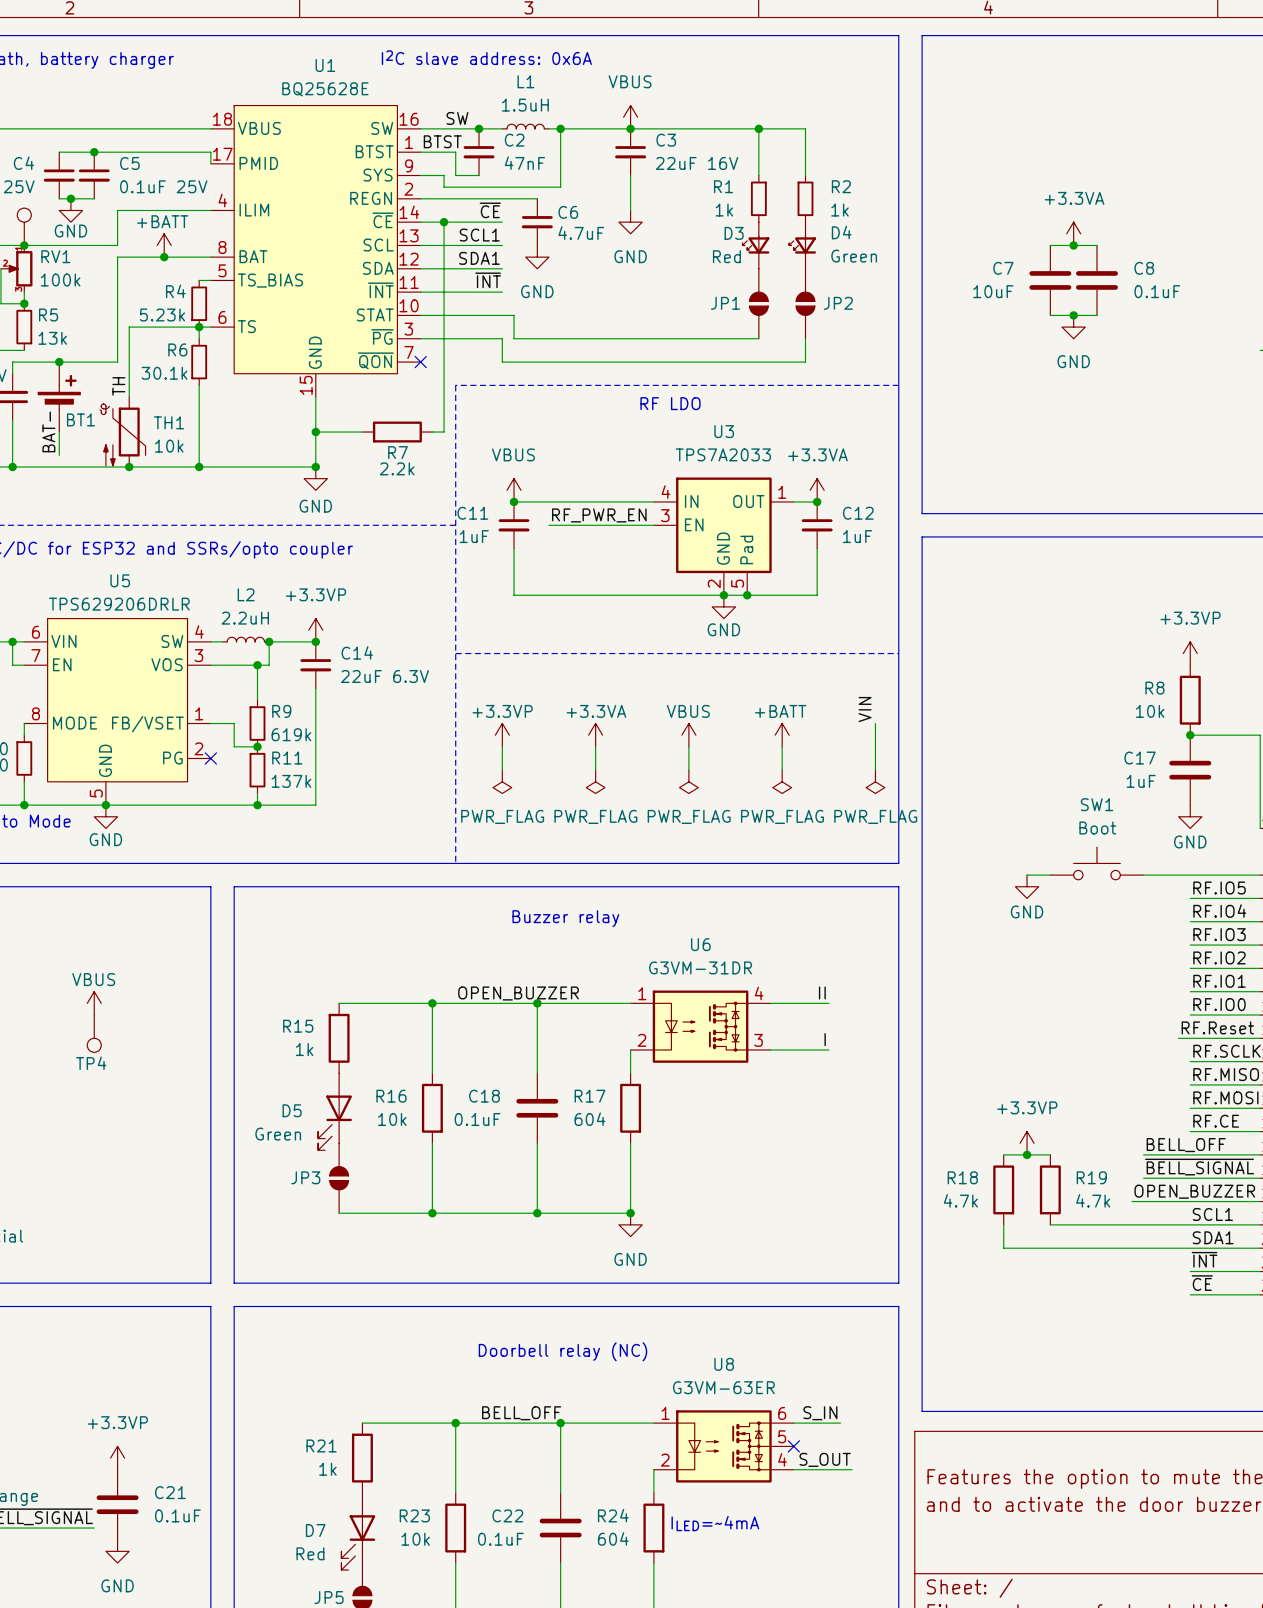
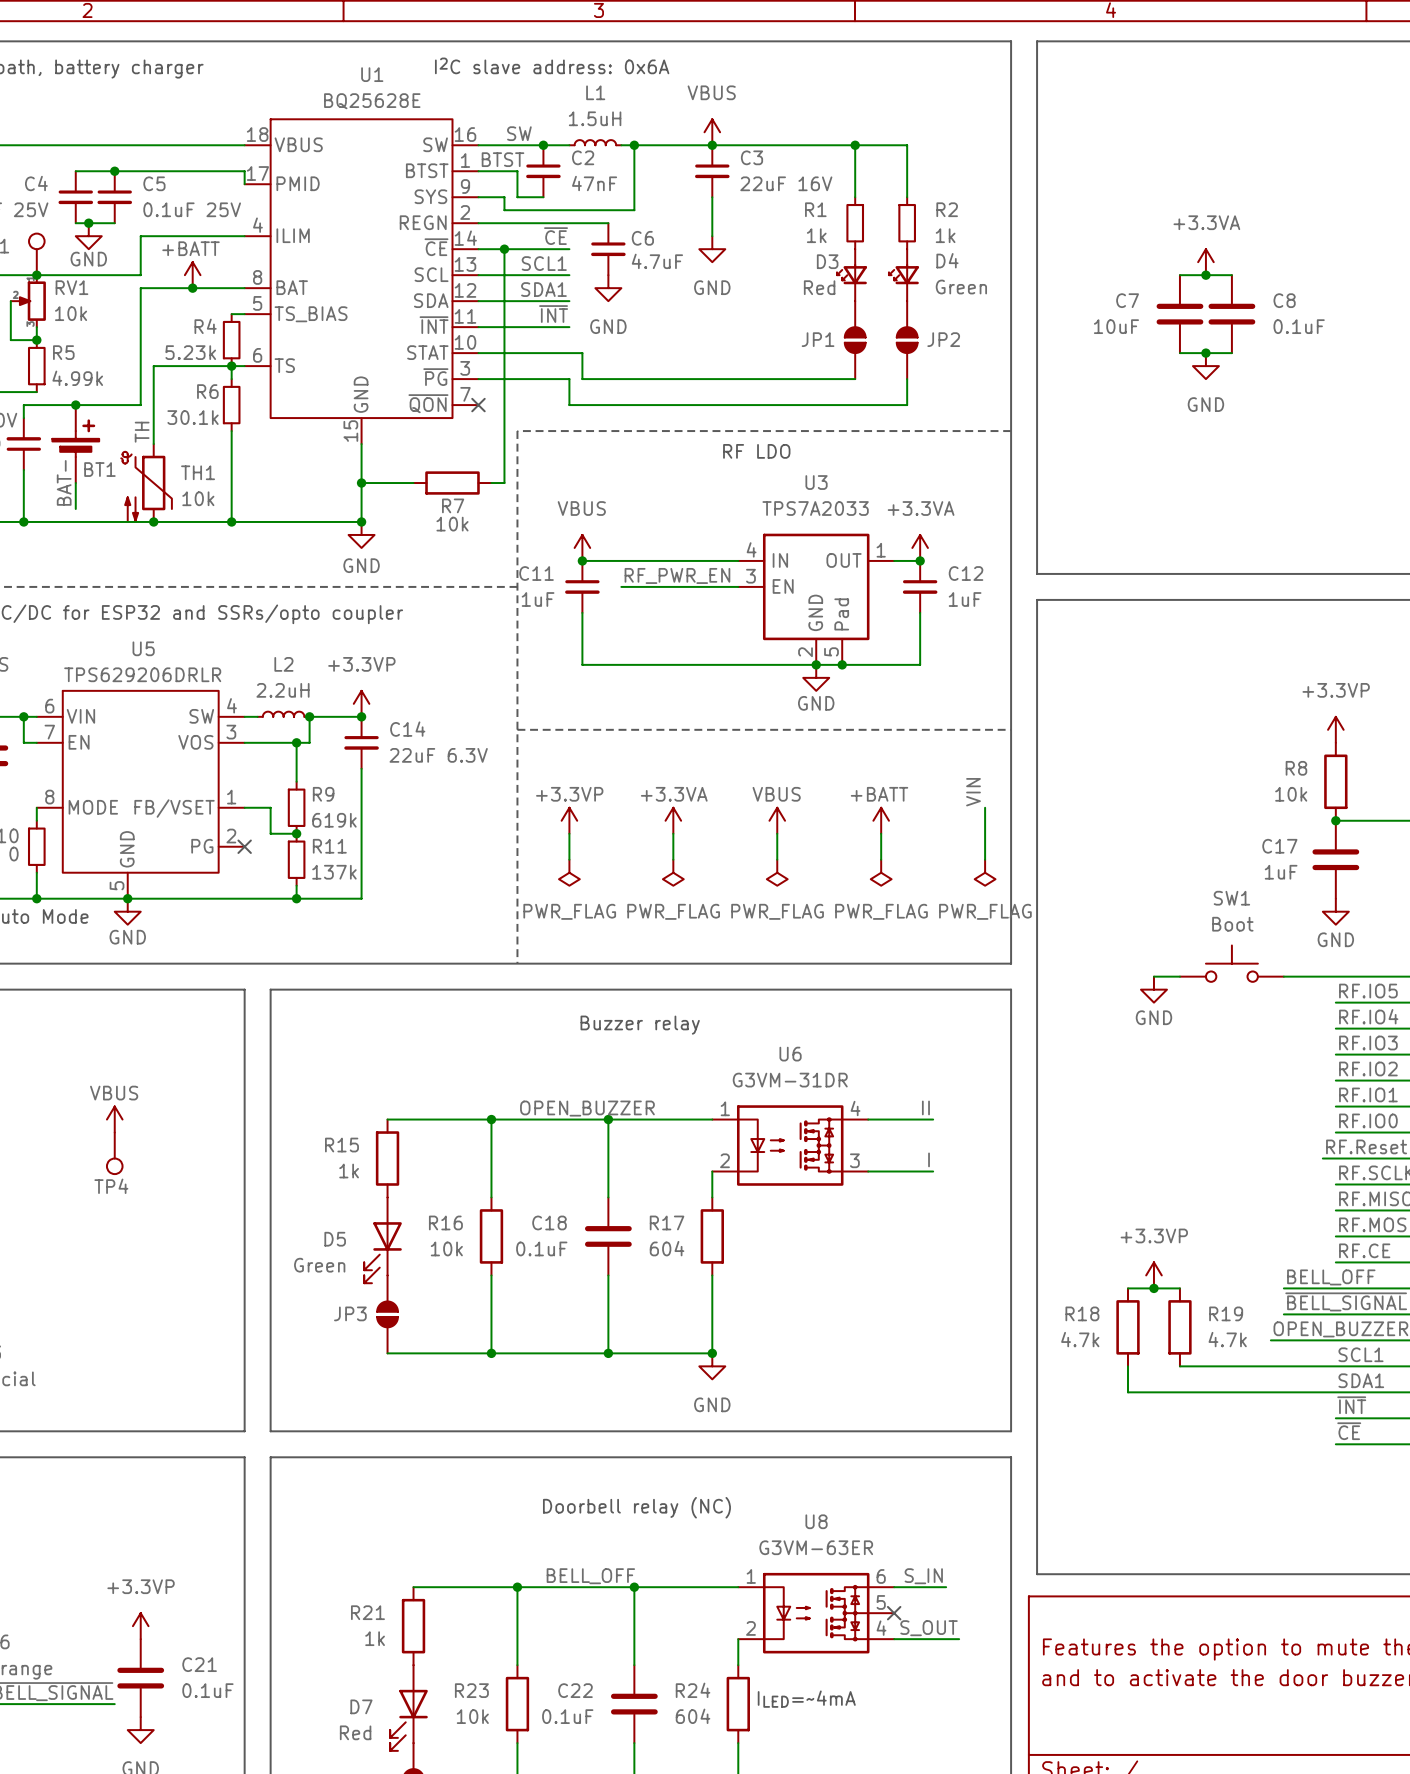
RV1 value: 100k (60, 280) -> 10k (71, 313)
R5 value: 13k (52, 338) -> 4.99k (77, 378)
R7 value: 2.2k (397, 468) -> 10k (452, 524)

